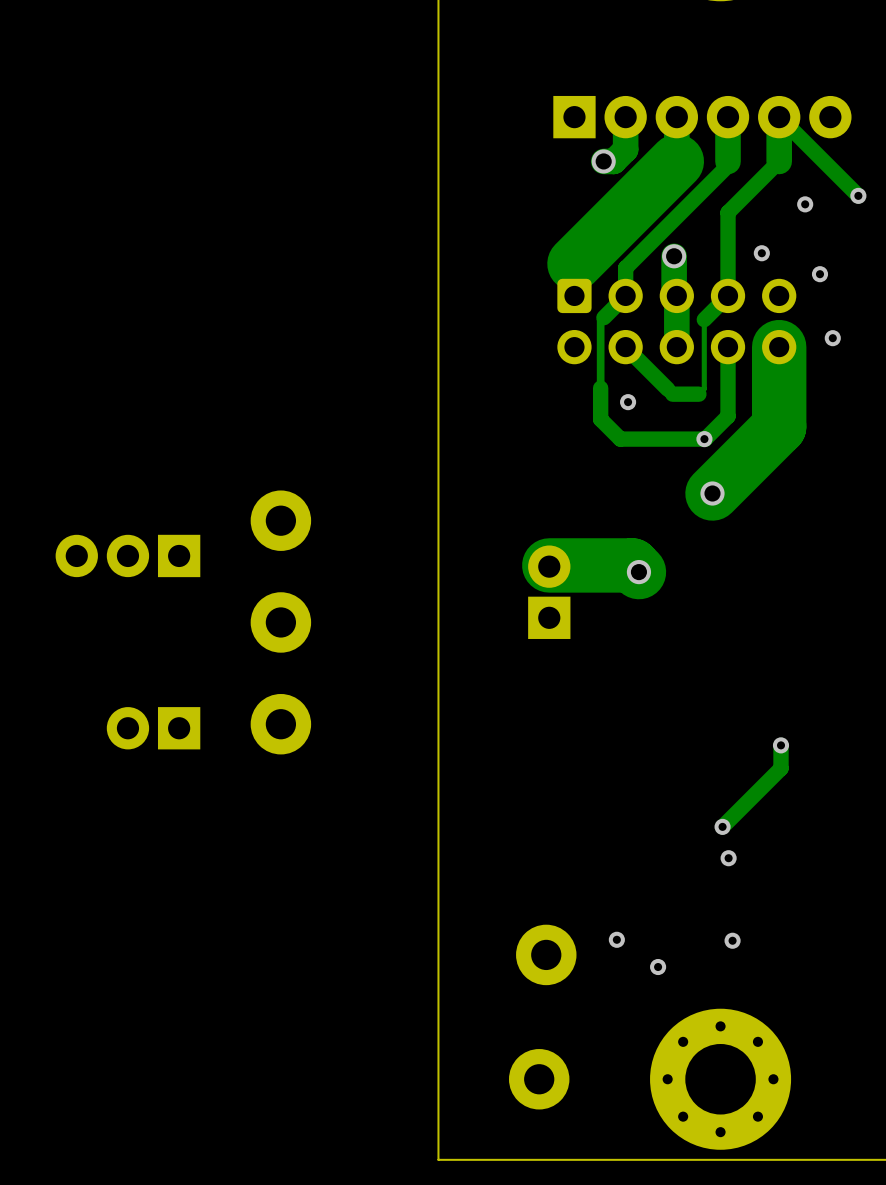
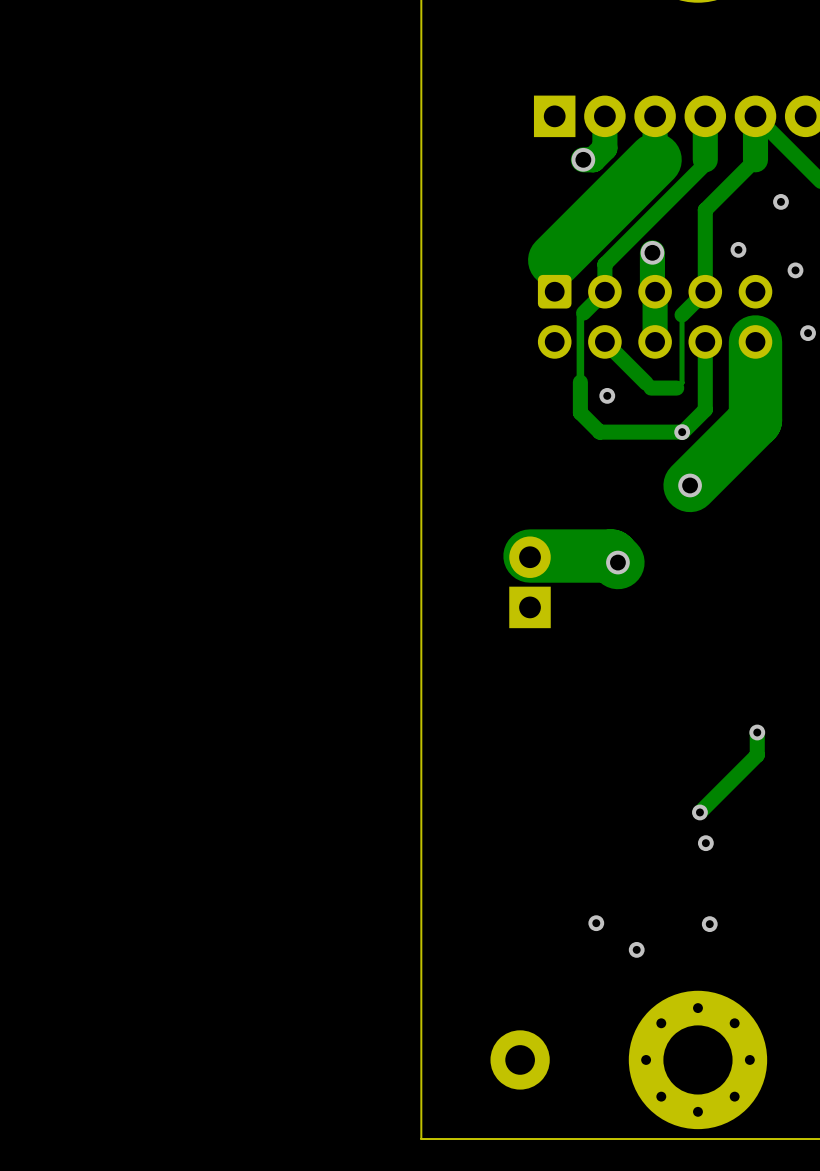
part: (280, 520) -> none
part: (127, 555) -> none
part: (280, 622) -> none
part: (280, 724) -> none
part: (153, 728) -> none
part: (546, 954) -> none

